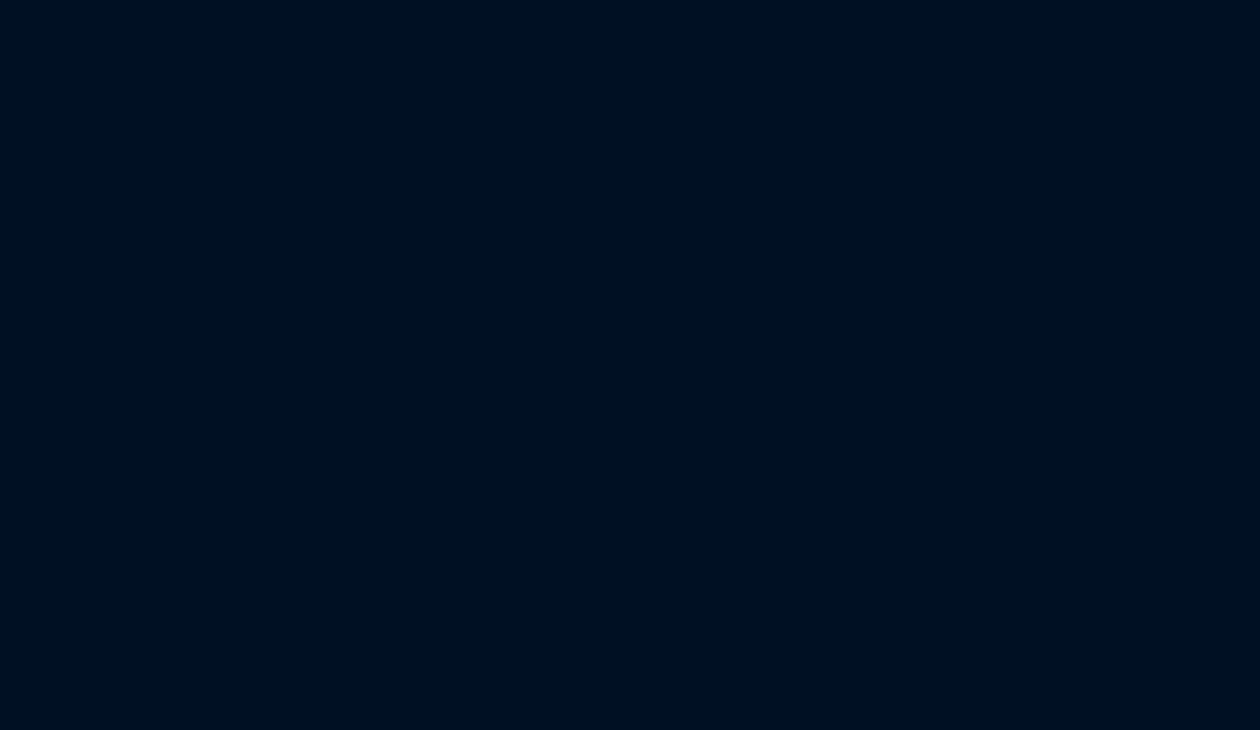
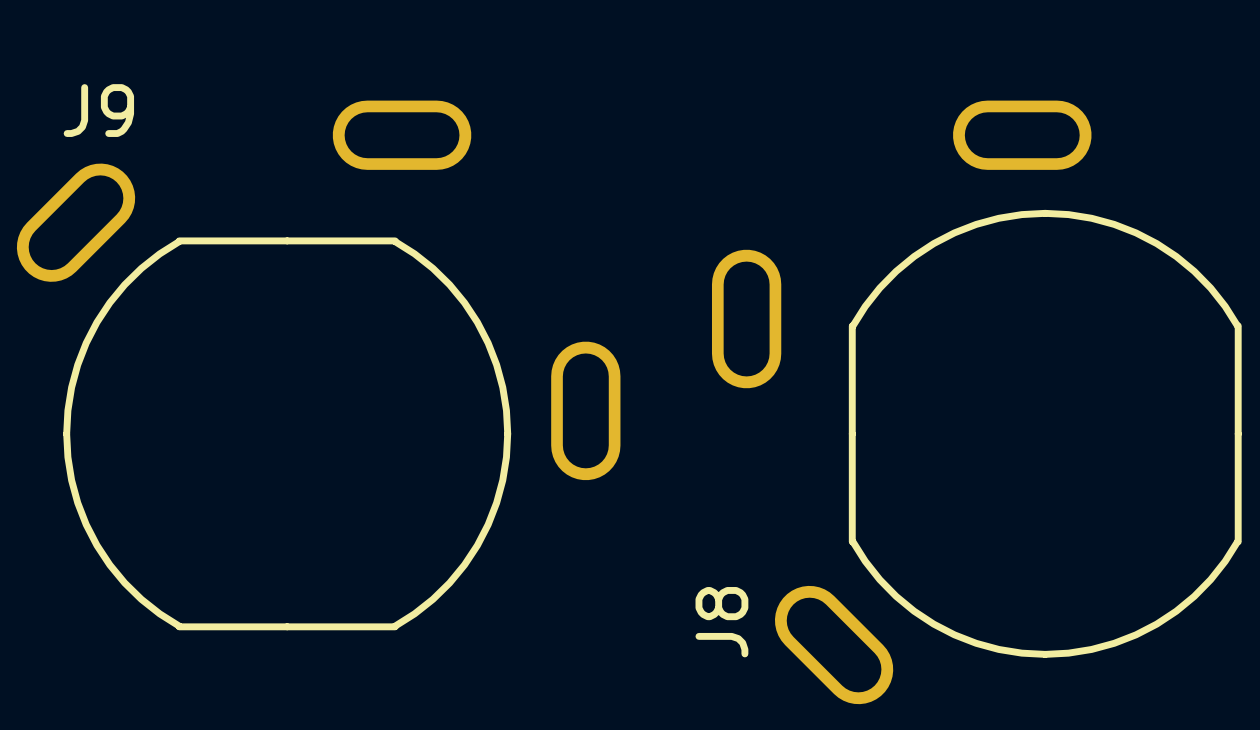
J9: none -> (318, 365)
J8: none -> (976, 402)

